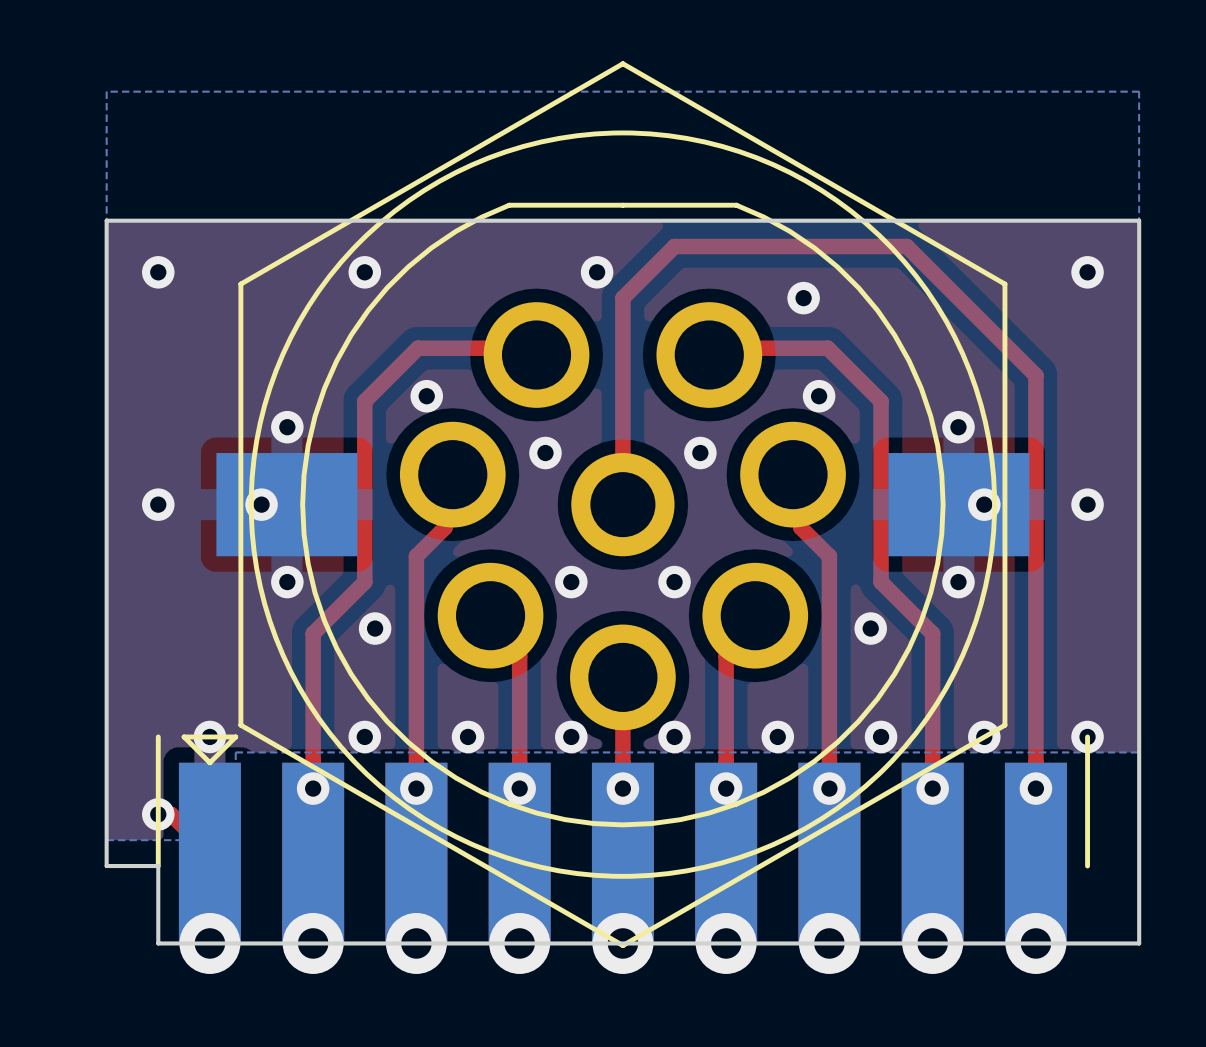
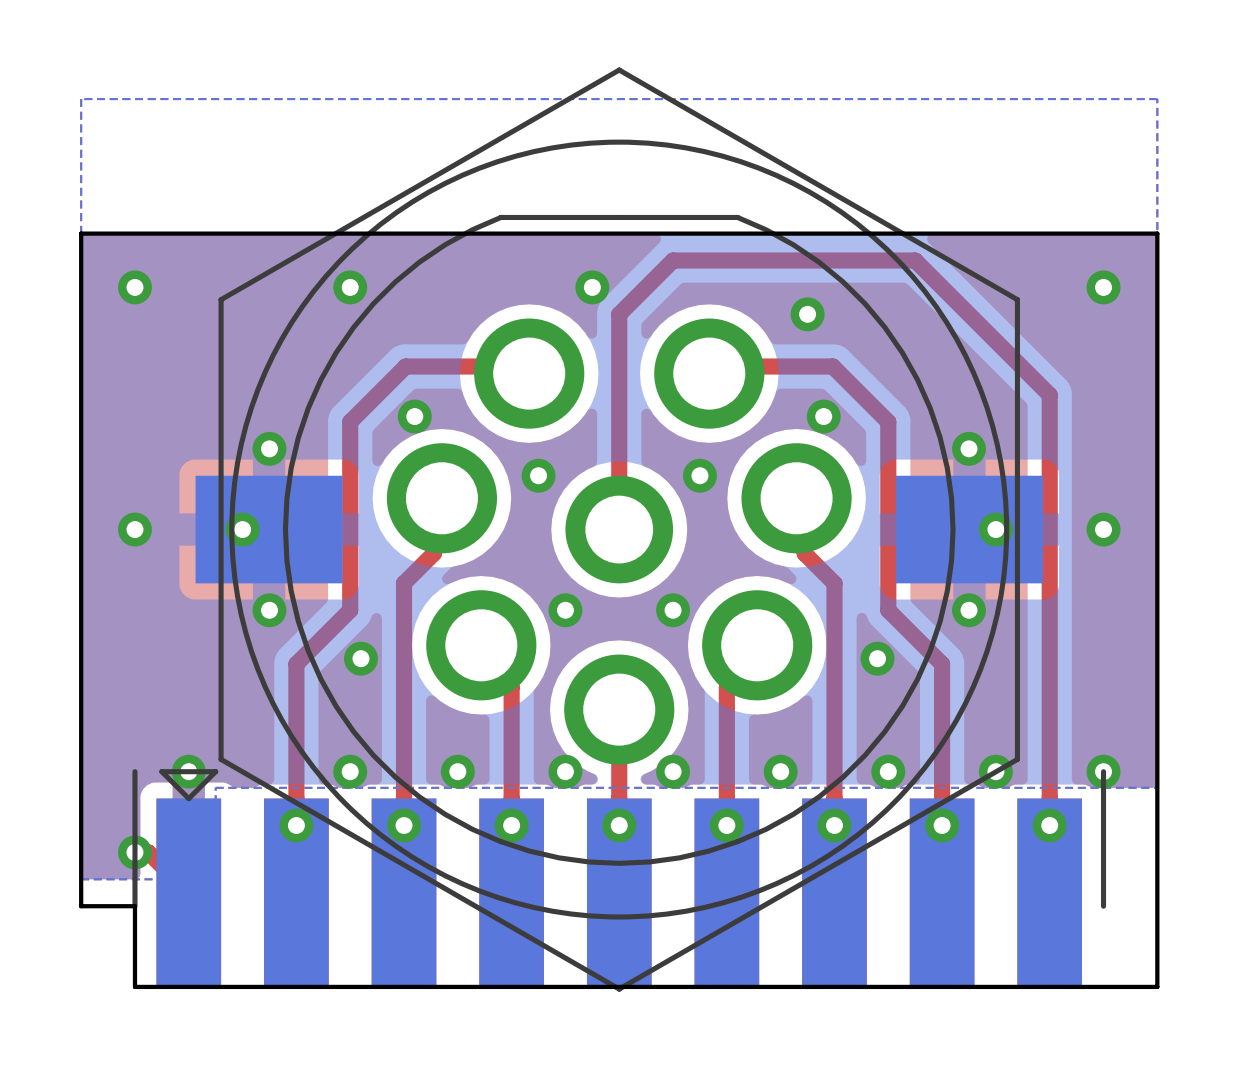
via: (209, 943) -> none
via: (313, 943) -> none
via: (416, 943) -> none
via: (519, 943) -> none
via: (622, 943) -> none
via: (726, 943) -> none
via: (829, 943) -> none
via: (932, 943) -> none
via: (1035, 943) -> none

